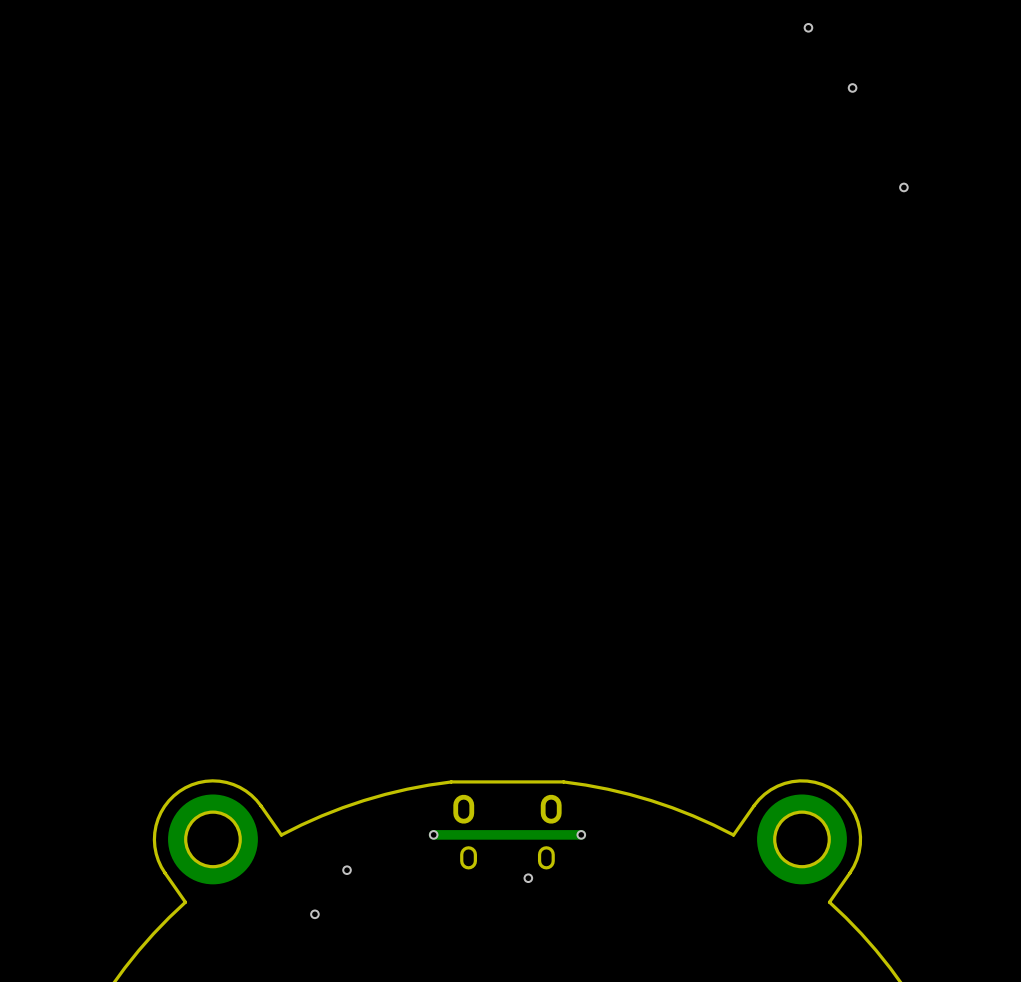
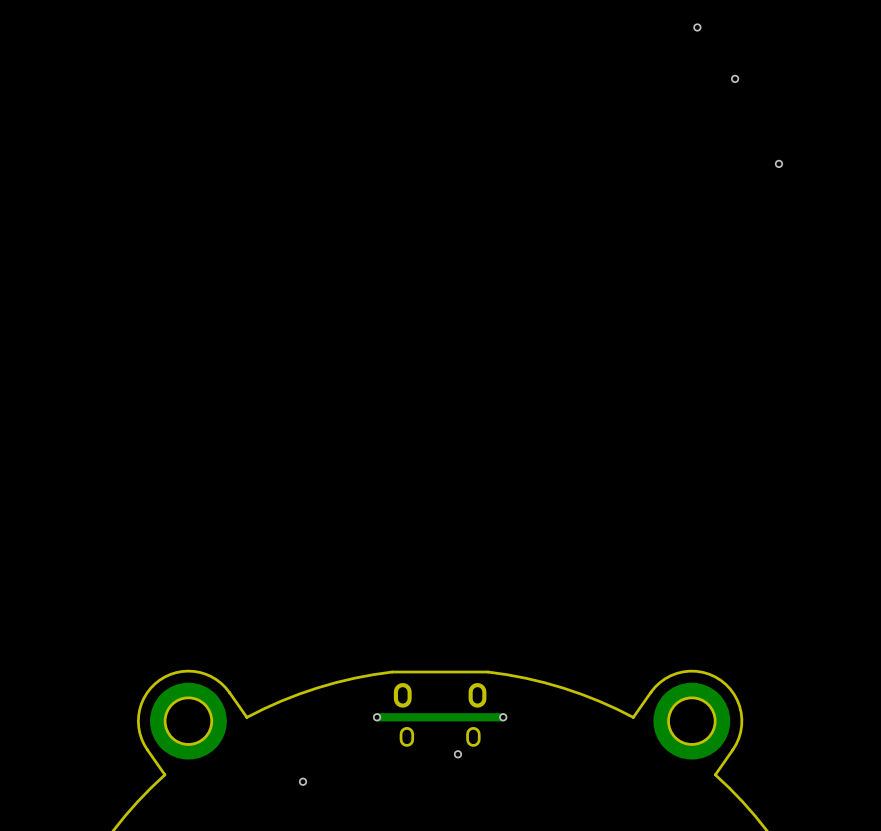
via: (347, 870) -> none
via: none -> (302, 781)
via: (314, 914) -> none

